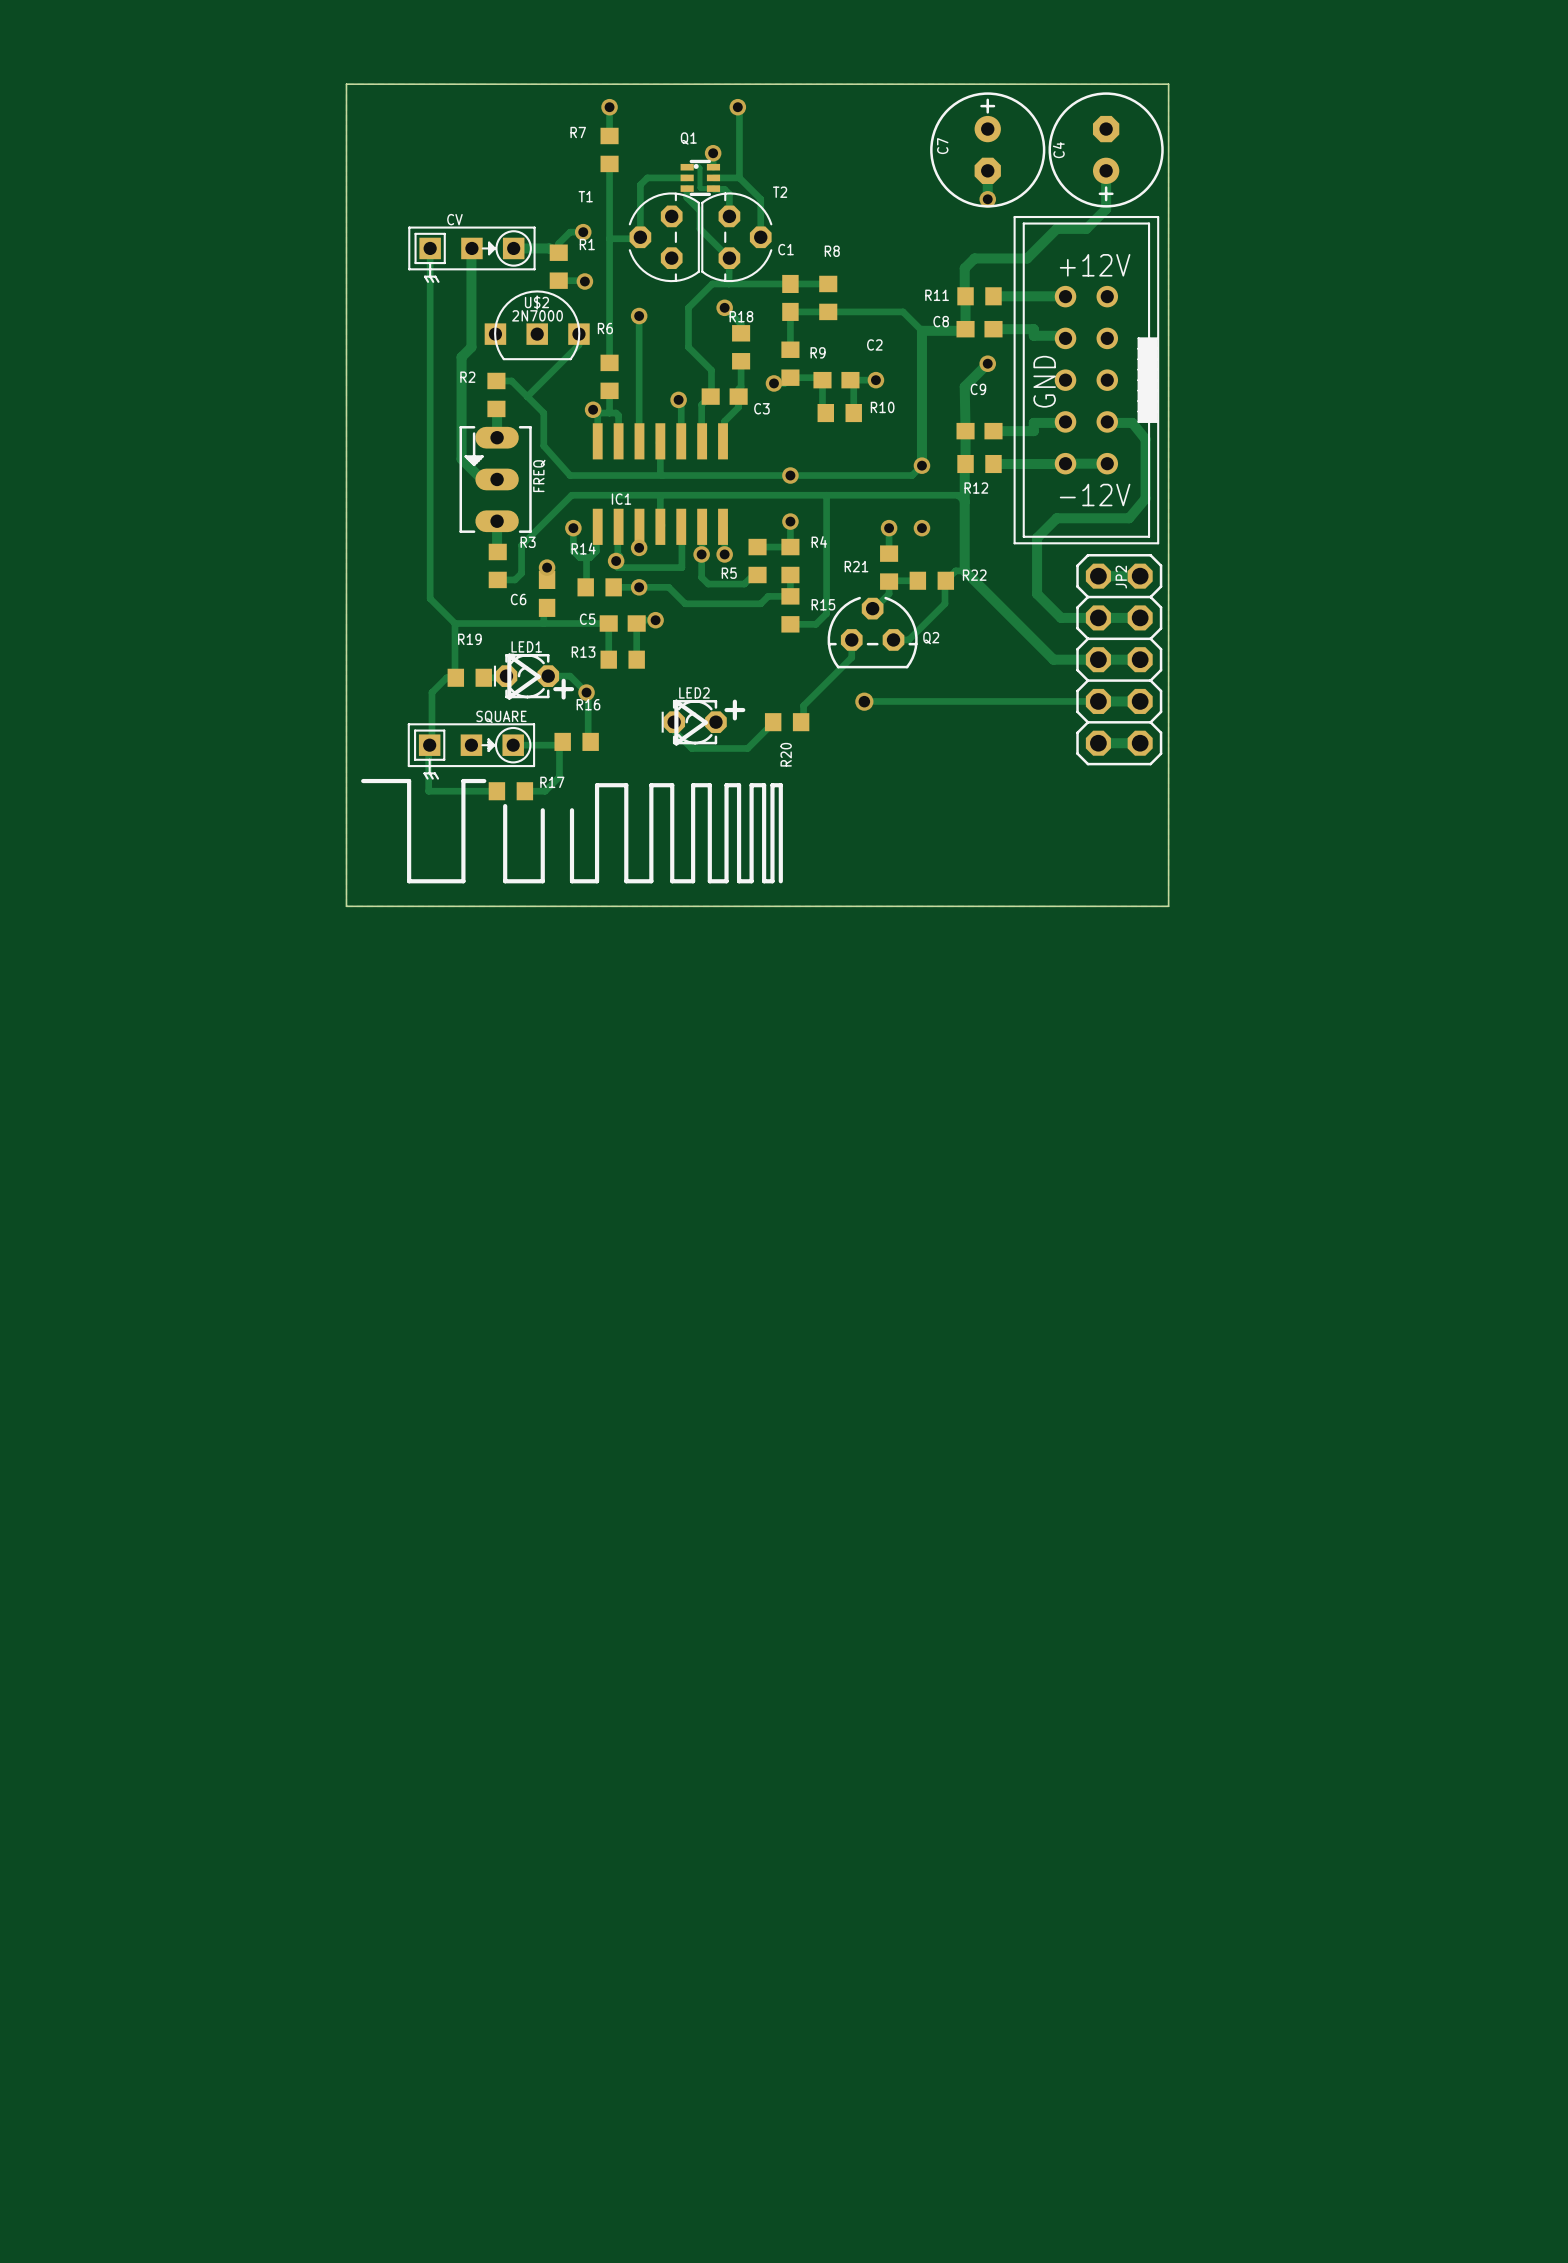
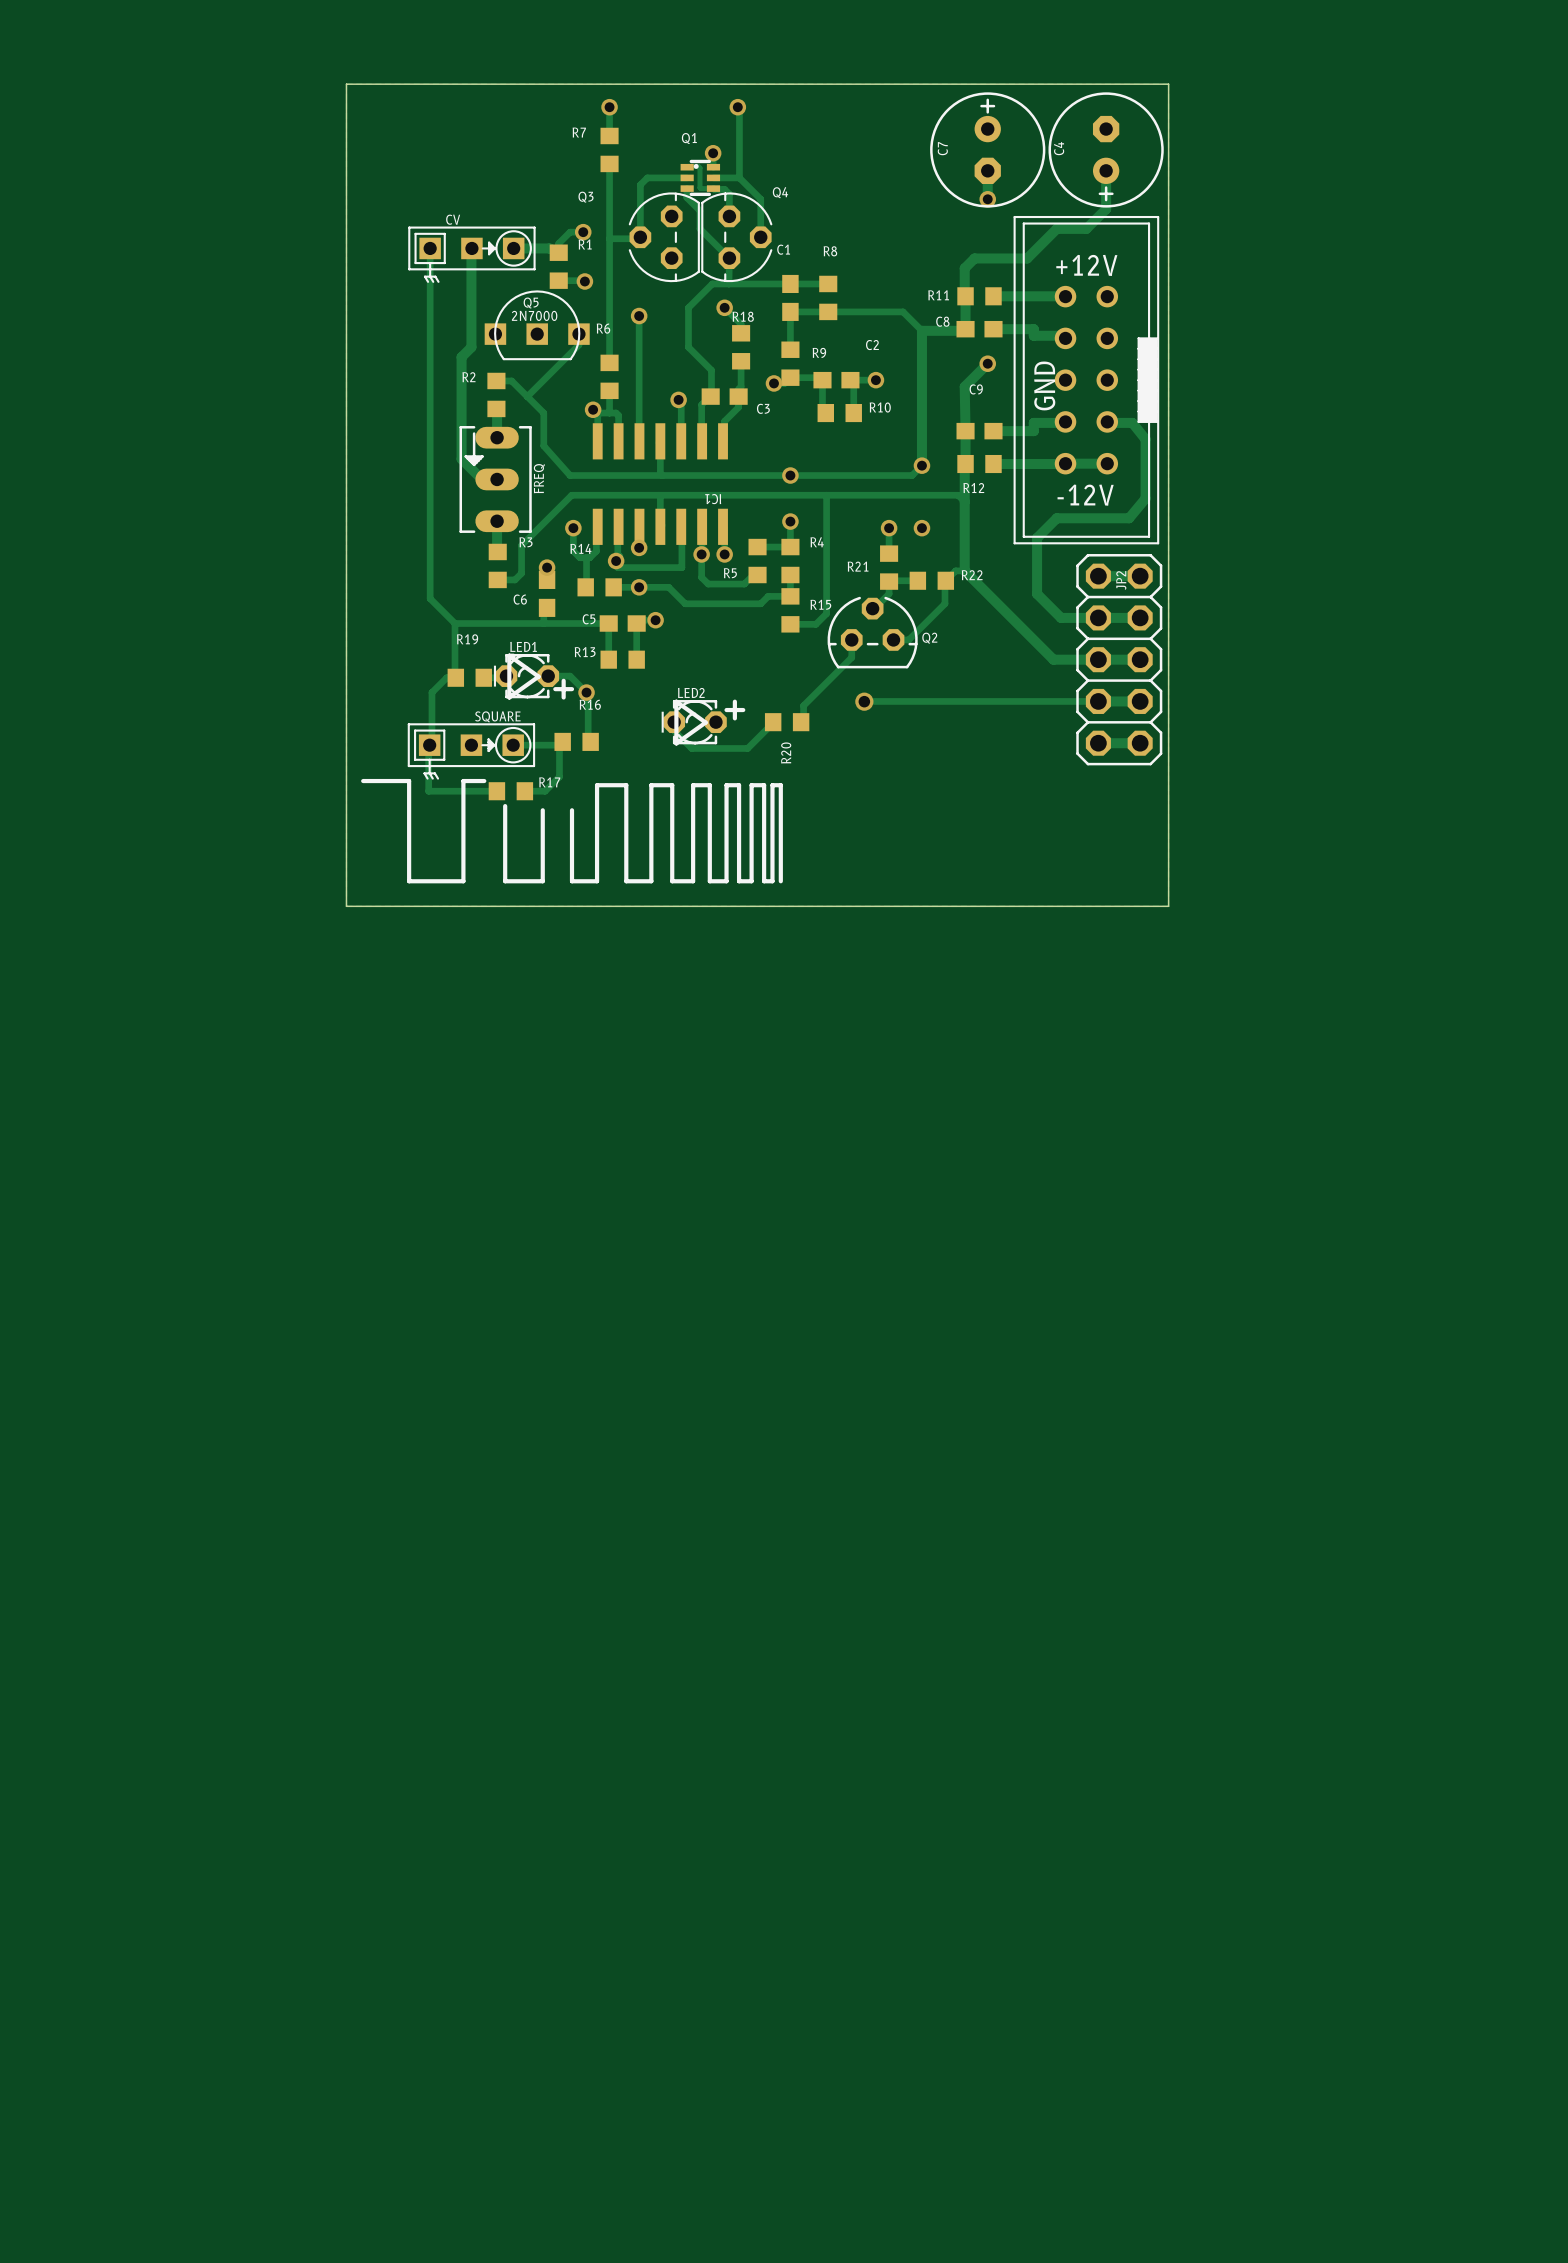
T2 name: T2 (780, 192) -> Q4 (780, 192)
T1 name: T1 (585, 196) -> Q3 (585, 197)
U$2 name: U$2 (536, 302) -> Q5 (531, 303)
IC1 name rotation: 0° (621, 499) -> 180° (713, 499)
IC1 name position: IC1 (621, 499) -> IC1 (713, 499)

